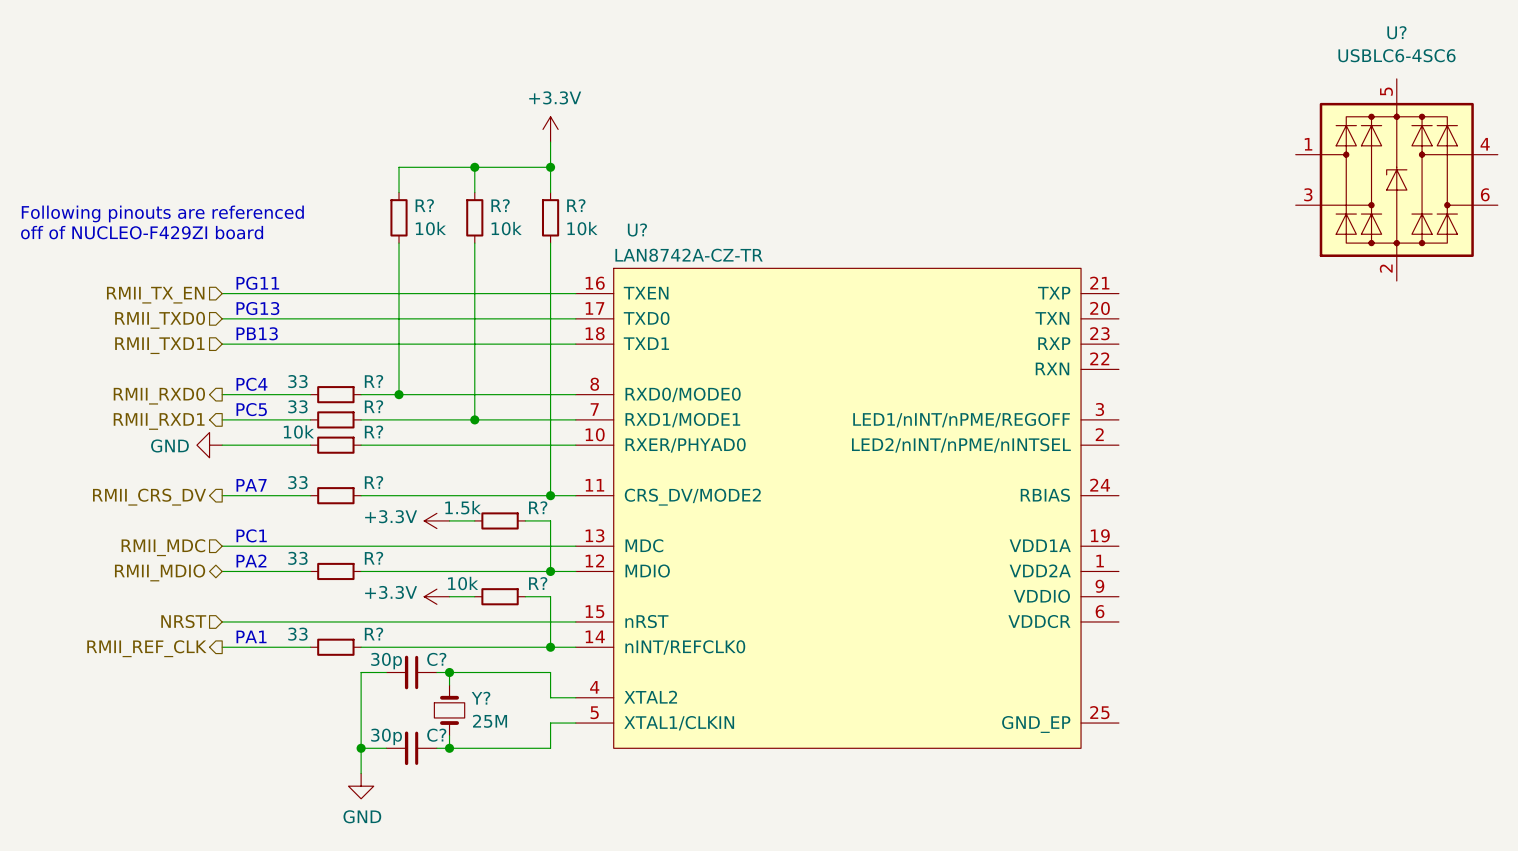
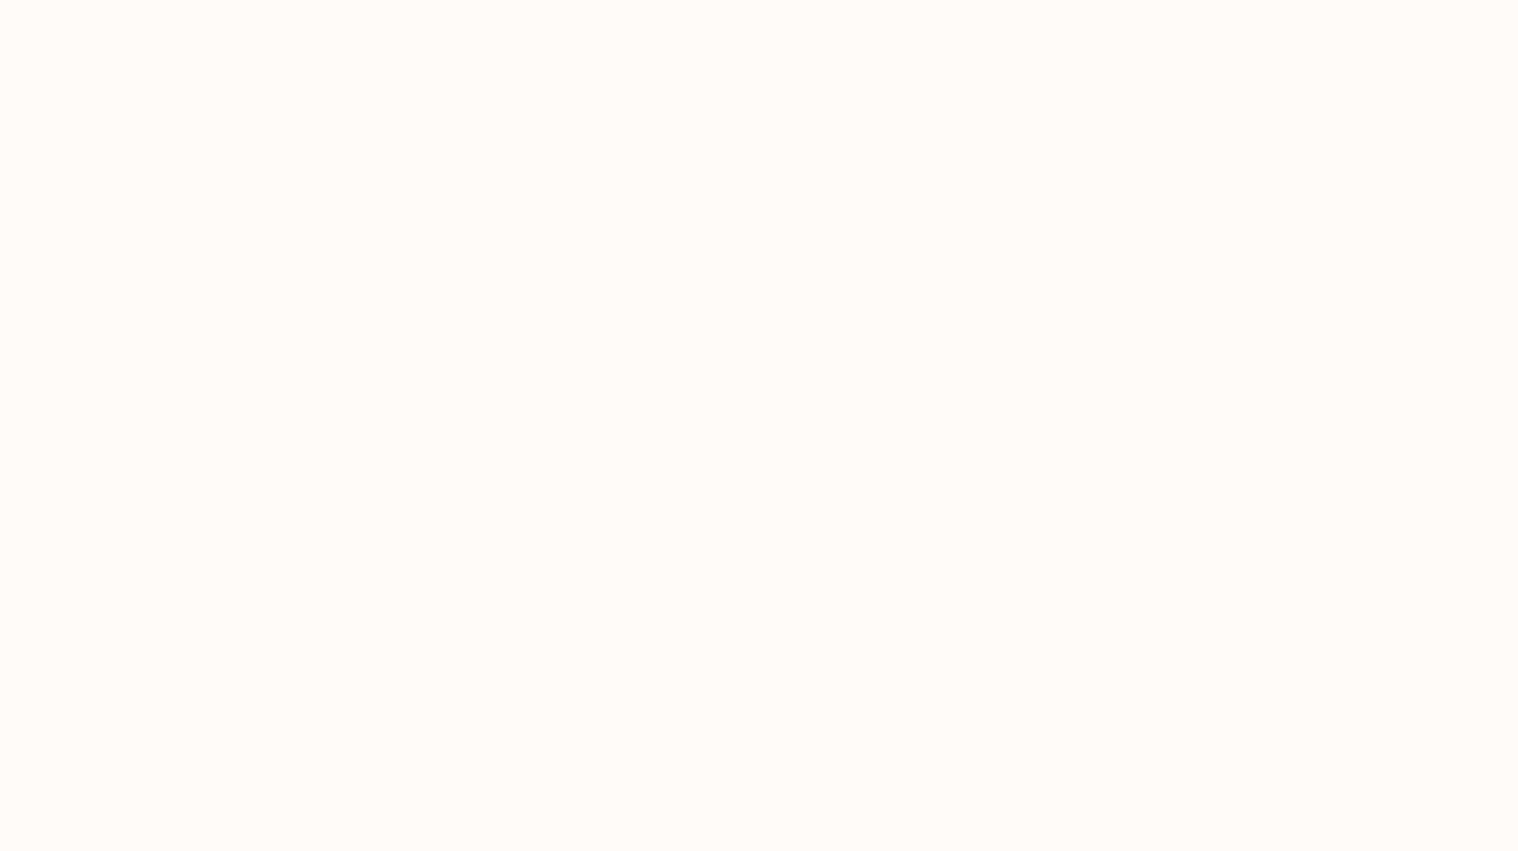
power symbol: +3.3V (550, 129) -> none
wire: (550, 142) (550, 192) -> none
wire: (474, 167) (474, 192) -> none
junction: (474, 167) -> none
wire: (550, 167) (399, 167) (399, 192) -> none
junction: (550, 167) -> none
U?: USBLC6-4SC6 (1396, 179) -> none
text: Following pinouts are referenced (162, 213) -> none
R?: 10k (399, 217) -> none
R?: 10k (474, 217) -> none
R?: 10k (550, 217) -> none
text: off of NUCLEO-F429ZI board (142, 232) -> none
wire: (399, 243) (399, 394) -> none
wire: (474, 243) (474, 419) -> none
wire: (550, 243) (550, 495) -> none
text: PG11 (257, 283) -> none
wire: (222, 293) (575, 293) -> none
hierarchical label: RMII_TX_EN (155, 295) -> none
text: PG13 (257, 308) -> none
wire: (222, 318) (575, 318) -> none
hierarchical label: RMII_TXD0 (160, 320) -> none
text: PB13 (257, 333) -> none
wire: (222, 344) (575, 344) -> none
hierarchical label: RMII_TXD1 (159, 345) -> none
text: PC4 (251, 384) -> none
wire: (222, 394) (310, 394) -> none
R?: 33 (335, 394) -> none
wire: (361, 394) (575, 394) -> none
junction: (399, 394) -> none
hierarchical label: RMII_RXD0 (159, 396) -> none
text: PC5 (251, 409) -> none
wire: (222, 419) (310, 419) -> none
R?: 33 (335, 419) -> none
wire: (361, 419) (575, 419) -> none
junction: (474, 419) -> none
hierarchical label: RMII_RXD1 (159, 421) -> none
power symbol: GND (209, 445) -> none
wire: (222, 445) (310, 445) -> none
R?: 10k (335, 445) -> none
wire: (361, 445) (575, 445) -> none
text: PA7 (251, 485) -> none
wire: (222, 495) (310, 495) -> none
R?: 33 (335, 495) -> none
wire: (361, 495) (575, 495) -> none
junction: (550, 495) -> none
hierarchical label: RMII_CRS_DV (149, 497) -> none
U?: LAN8742A-CZ-TR (847, 508) -> none
power symbol: +3.3V (436, 520) -> none
wire: (449, 520) (474, 520) -> none
R?: 1.5k (500, 520) -> none
wire: (525, 520) (550, 520) (550, 571) -> none
text: PC1 (251, 535) -> none
wire: (222, 546) (575, 546) -> none
hierarchical label: RMII_MDC (163, 547) -> none
text: PA2 (251, 561) -> none
wire: (222, 571) (310, 571) -> none
R?: 33 (335, 571) -> none
wire: (361, 571) (575, 571) -> none
junction: (550, 571) -> none
hierarchical label: RMII_MDIO (160, 572) -> none
power symbol: +3.3V (436, 596) -> none
wire: (449, 596) (474, 596) -> none
R?: 10k (500, 596) -> none
wire: (525, 596) (550, 596) (550, 647) -> none
hierarchical label: NRST (183, 621) -> none
wire: (222, 621) (575, 621) -> none
text: PA1 (251, 636) -> none
wire: (222, 647) (310, 647) -> none
R?: 33 (335, 647) -> none
wire: (361, 647) (575, 647) -> none
junction: (550, 647) -> none
hierarchical label: RMII_REF_CLK (146, 648) -> none
wire: (386, 672) (361, 672) (361, 773) -> none
C?: 30p (411, 672) -> none
wire: (436, 672) (550, 672) (550, 697) (575, 697) -> none
wire: (449, 672) (449, 685) -> none
junction: (449, 672) -> none
Y?: 25M (449, 710) -> none
wire: (575, 723) (550, 723) (550, 748) (436, 748) -> none
wire: (449, 735) (449, 748) -> none
wire: (361, 748) (386, 748) -> none
junction: (361, 748) -> none
C?: 30p (411, 748) -> none
junction: (449, 748) -> none
power symbol: GND (361, 786) -> none

